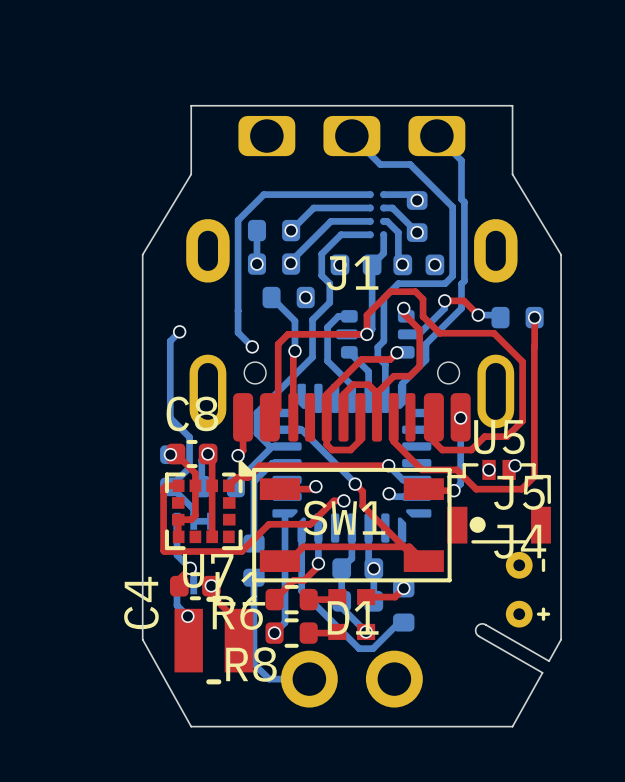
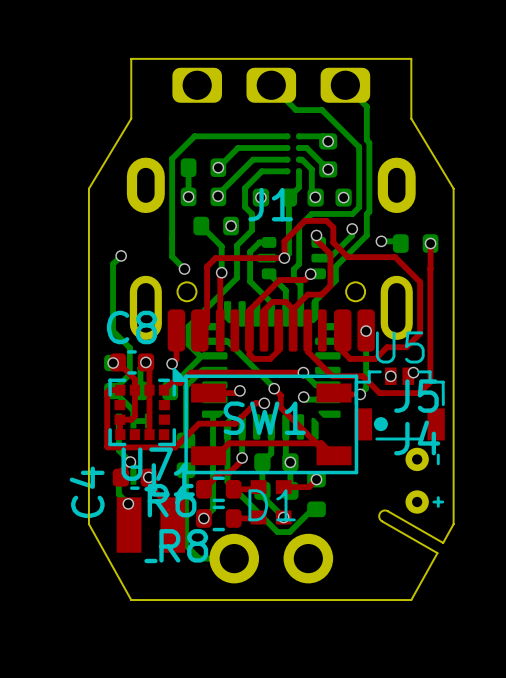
top track: (444, 300) (464, 300) (478, 315) -> none

